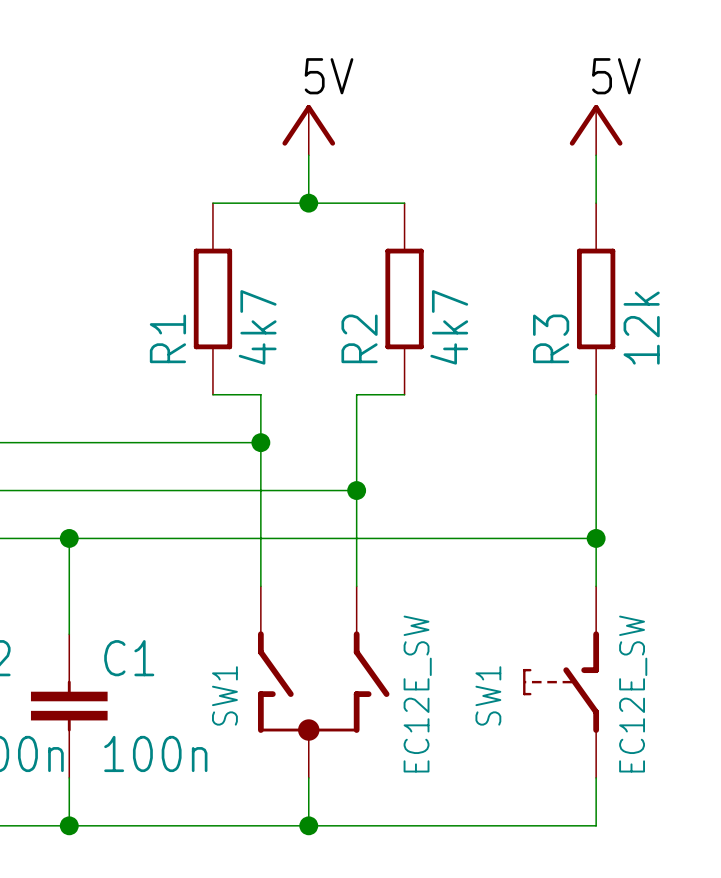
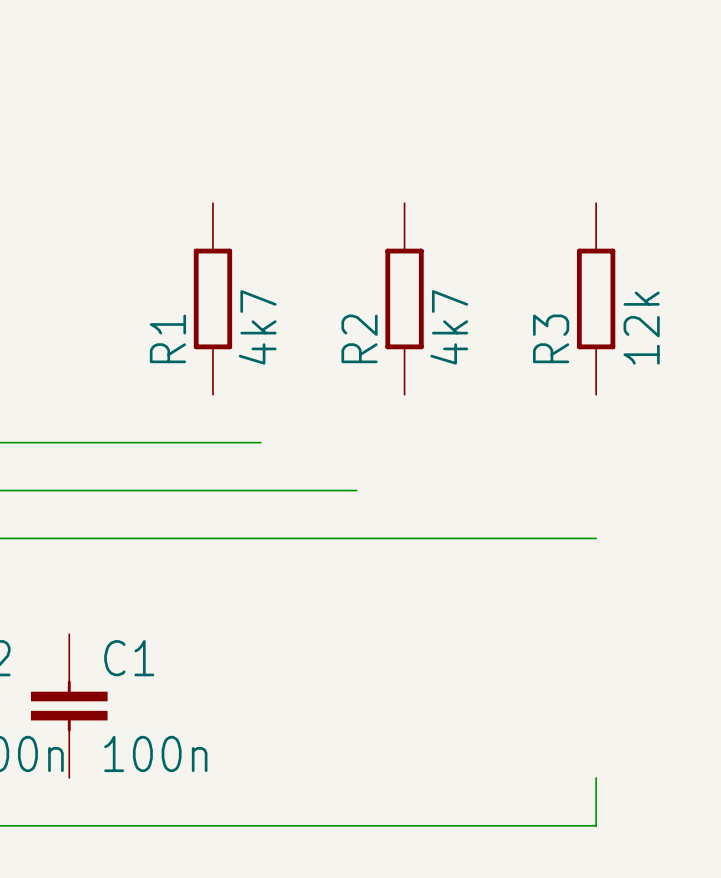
label: 5V (329, 76) -> none
label: 5V (616, 76) -> none
power symbol: (308, 130) -> none
power symbol: (596, 130) -> none
wire: (308, 155) (308, 203) -> none
wire: (596, 155) (596, 203) -> none
wire: (212, 203) (404, 203) -> none
junction: (308, 203) -> none
wire: (212, 394) (260, 394) (260, 586) -> none
wire: (404, 394) (356, 394) (356, 586) -> none
wire: (596, 394) (596, 586) -> none
junction: (260, 442) -> none
junction: (356, 490) -> none
wire: (69, 538) (69, 634) -> none
junction: (69, 538) -> none
junction: (596, 538) -> none
SW1: EC12E_SW (323, 682) -> none
SW1: EC12E_SW (561, 682) -> none
wire: (69, 777) (69, 825) -> none
wire: (308, 777) (308, 825) -> none
junction: (69, 825) -> none
junction: (308, 825) -> none

